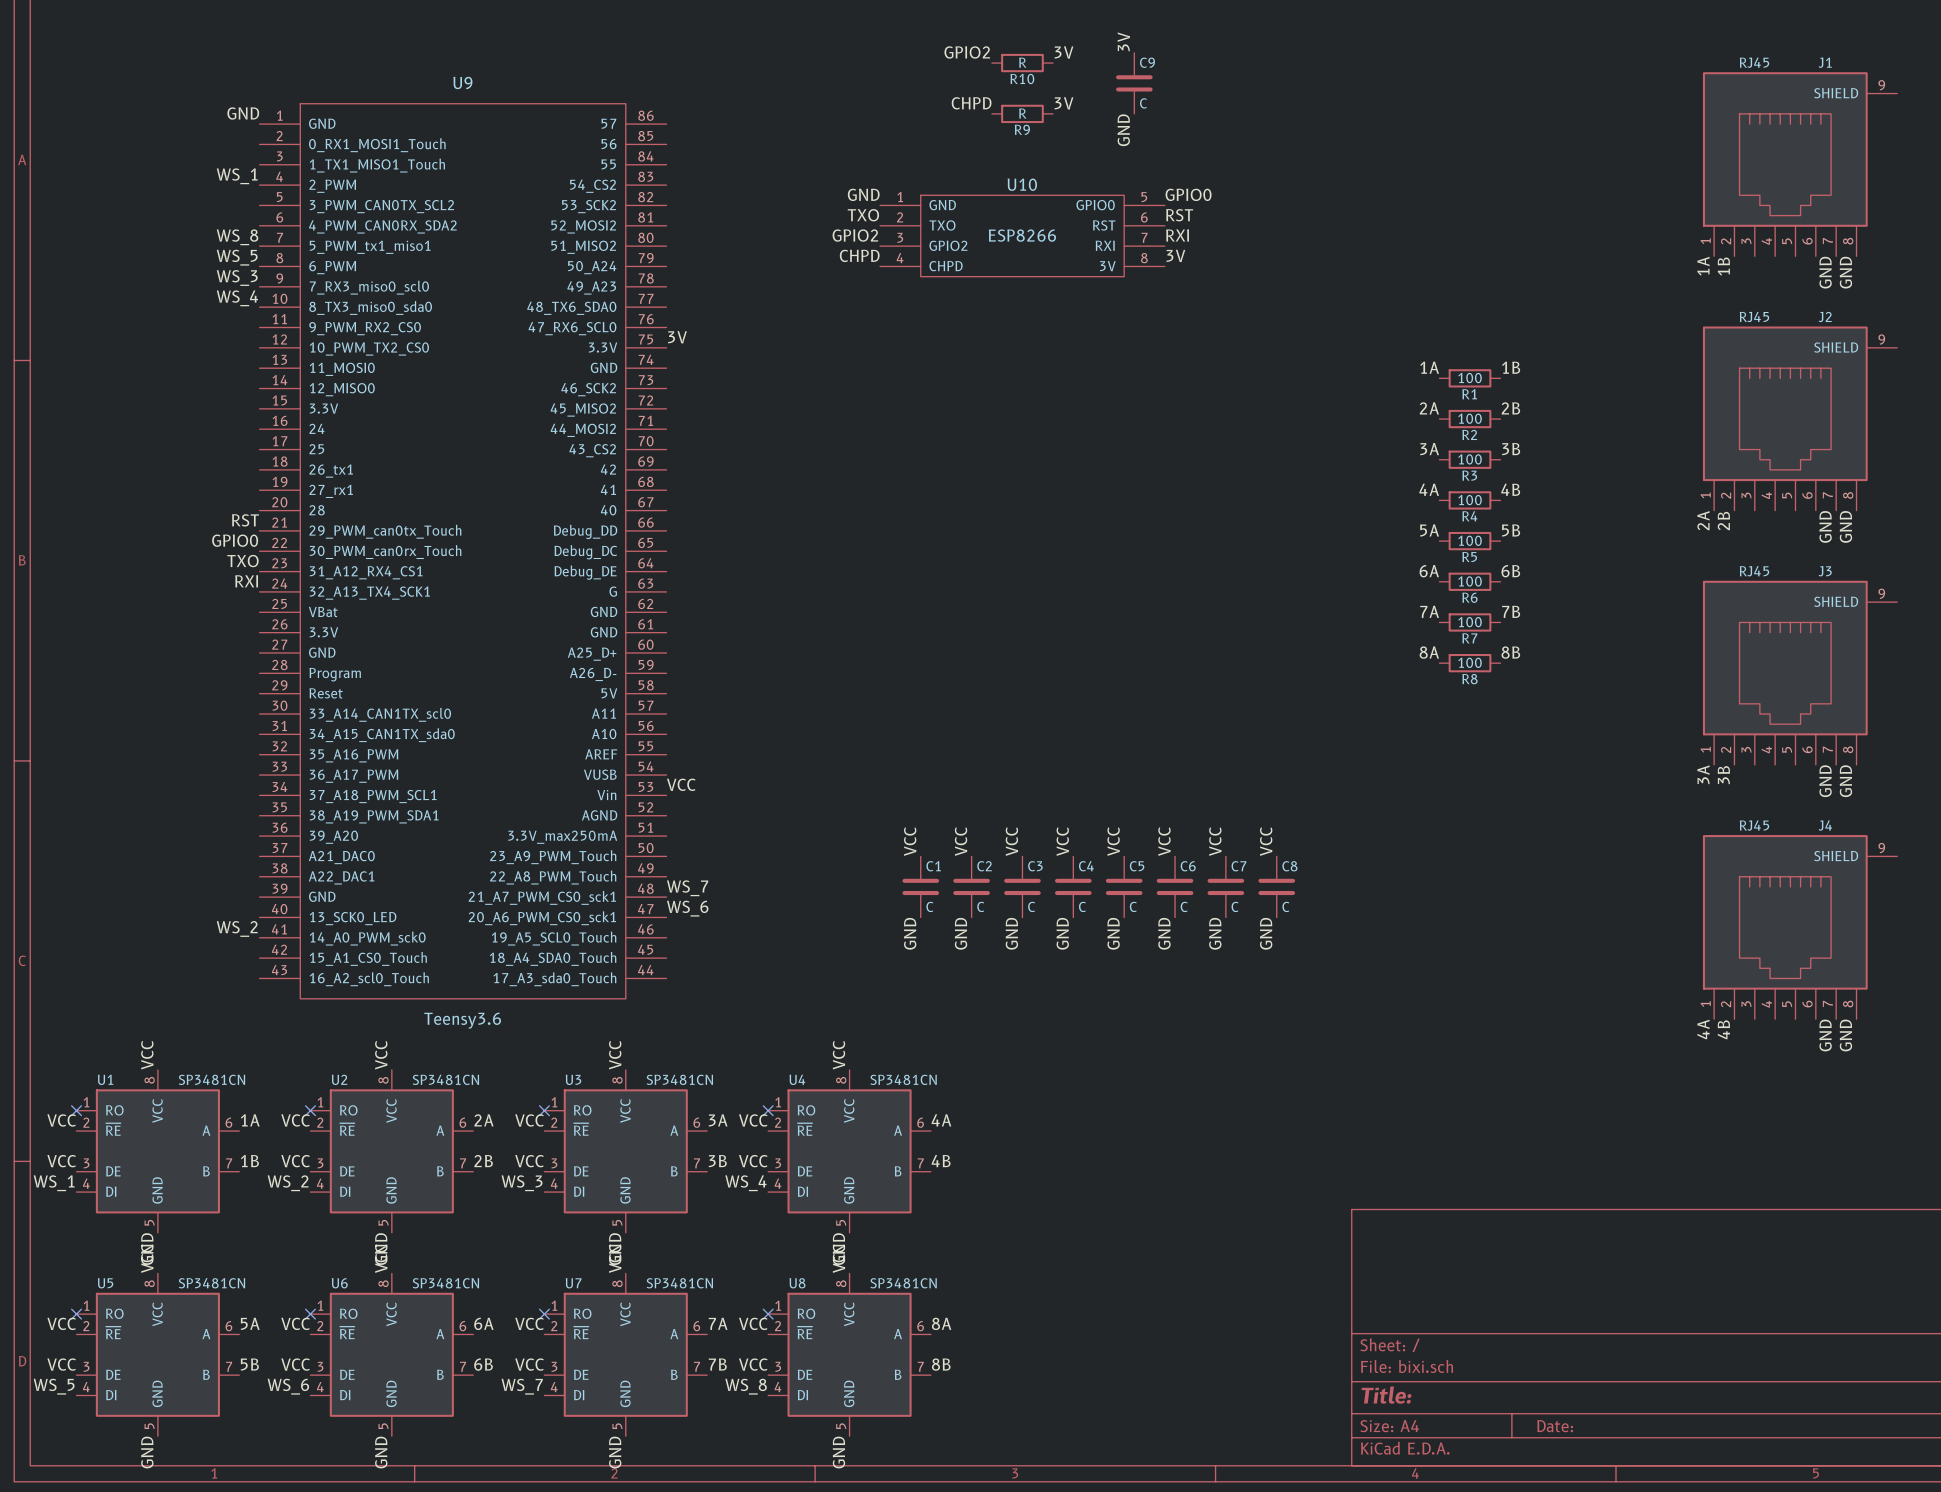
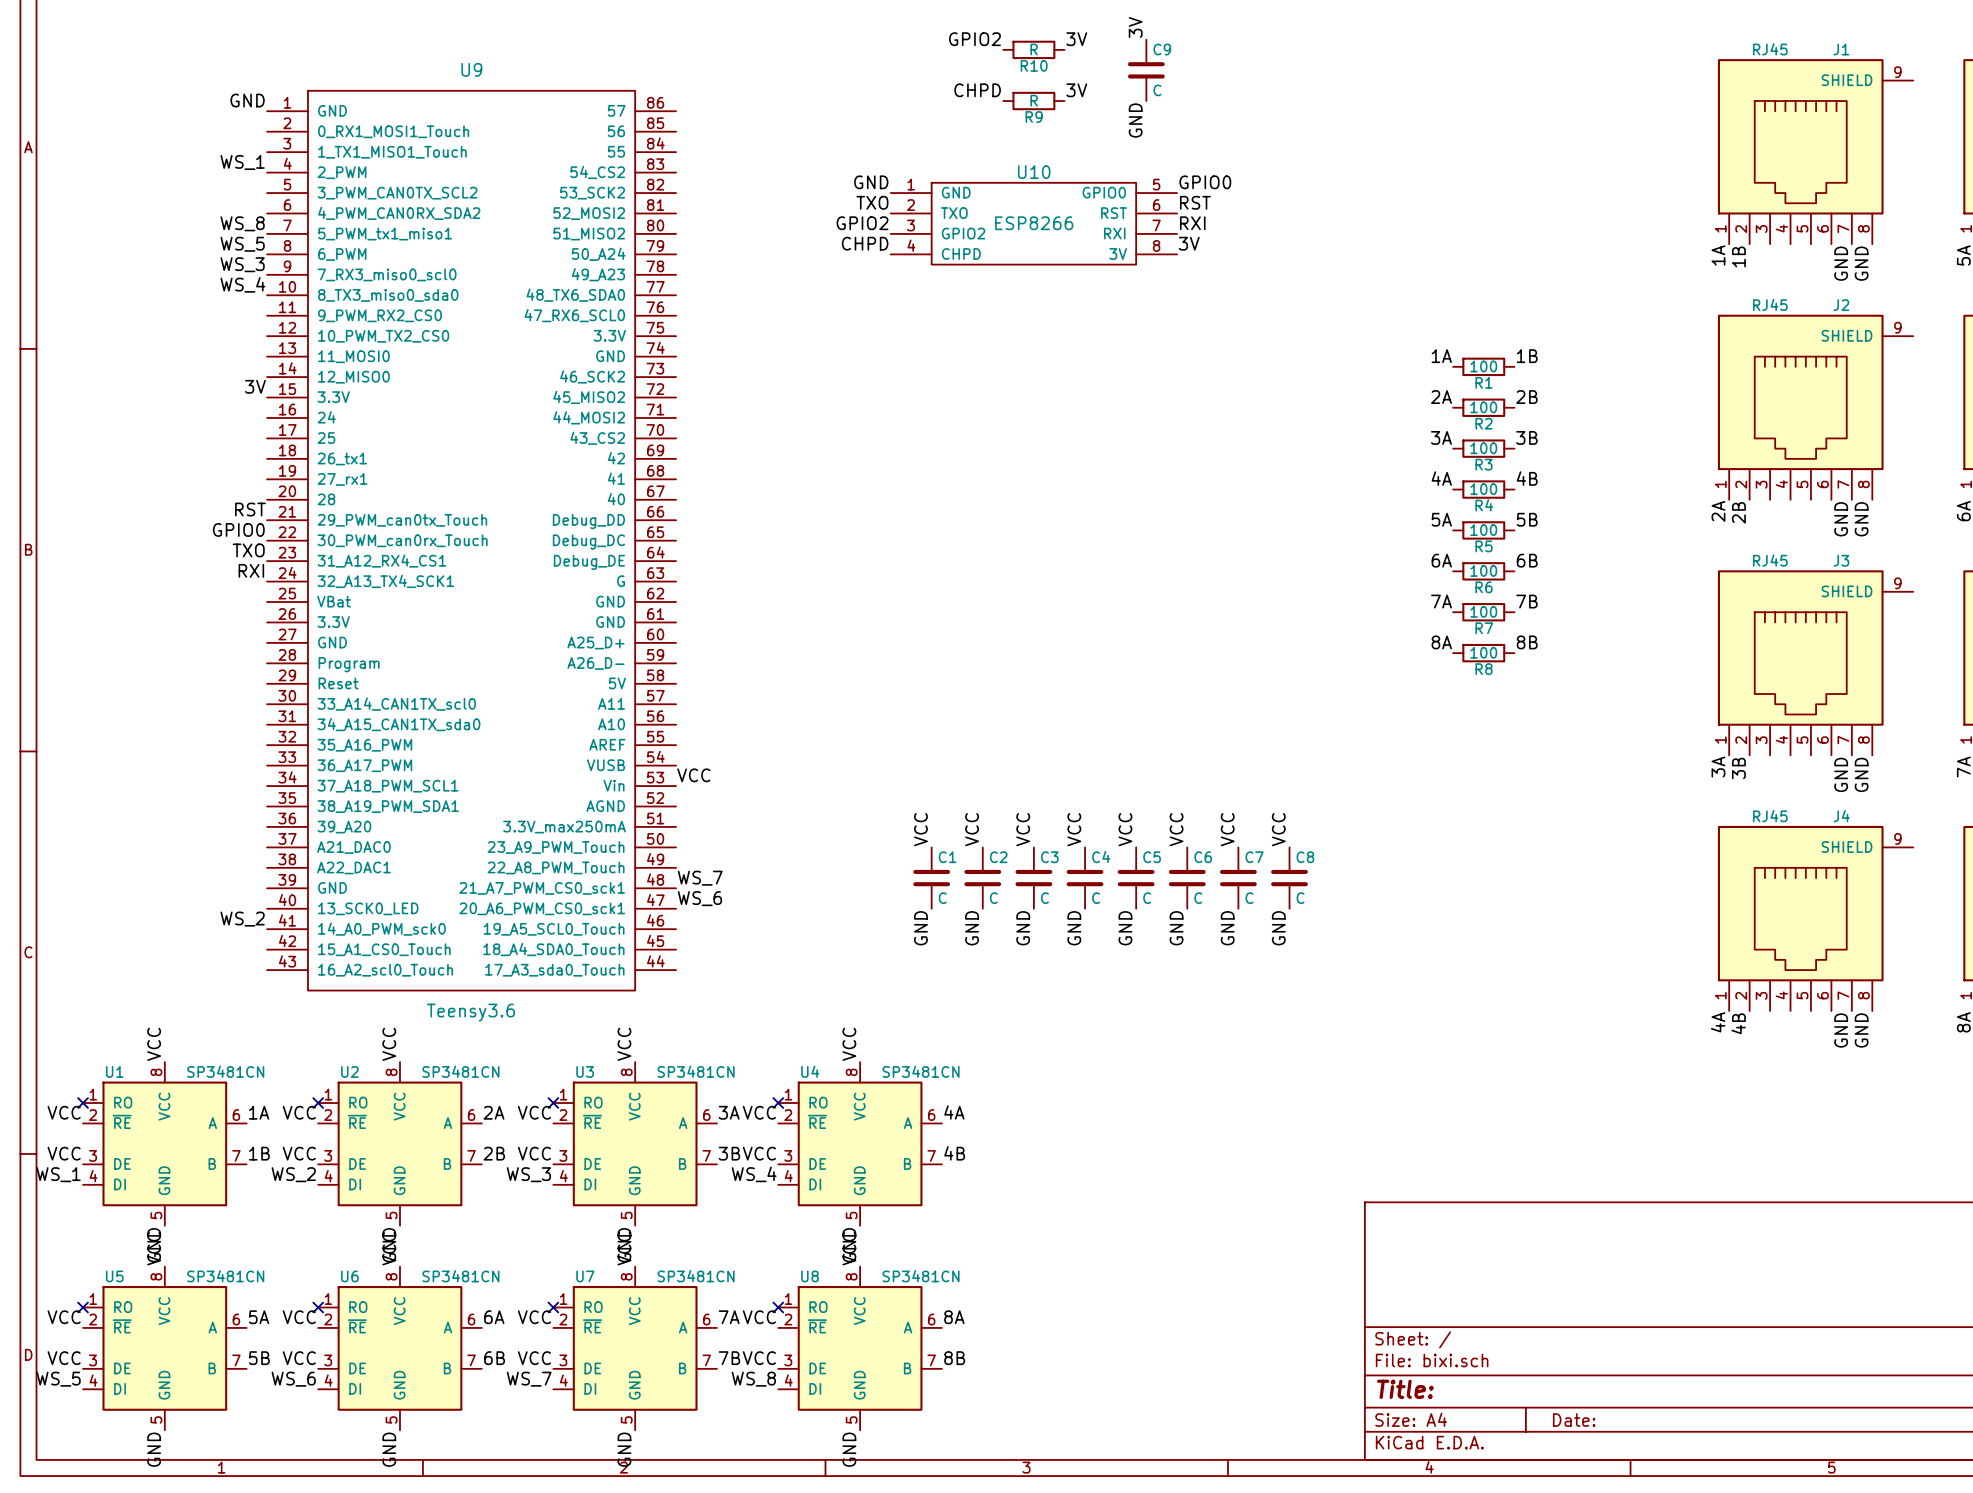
label: 3V (677, 337) -> none
label: none -> 3V (255, 386)

